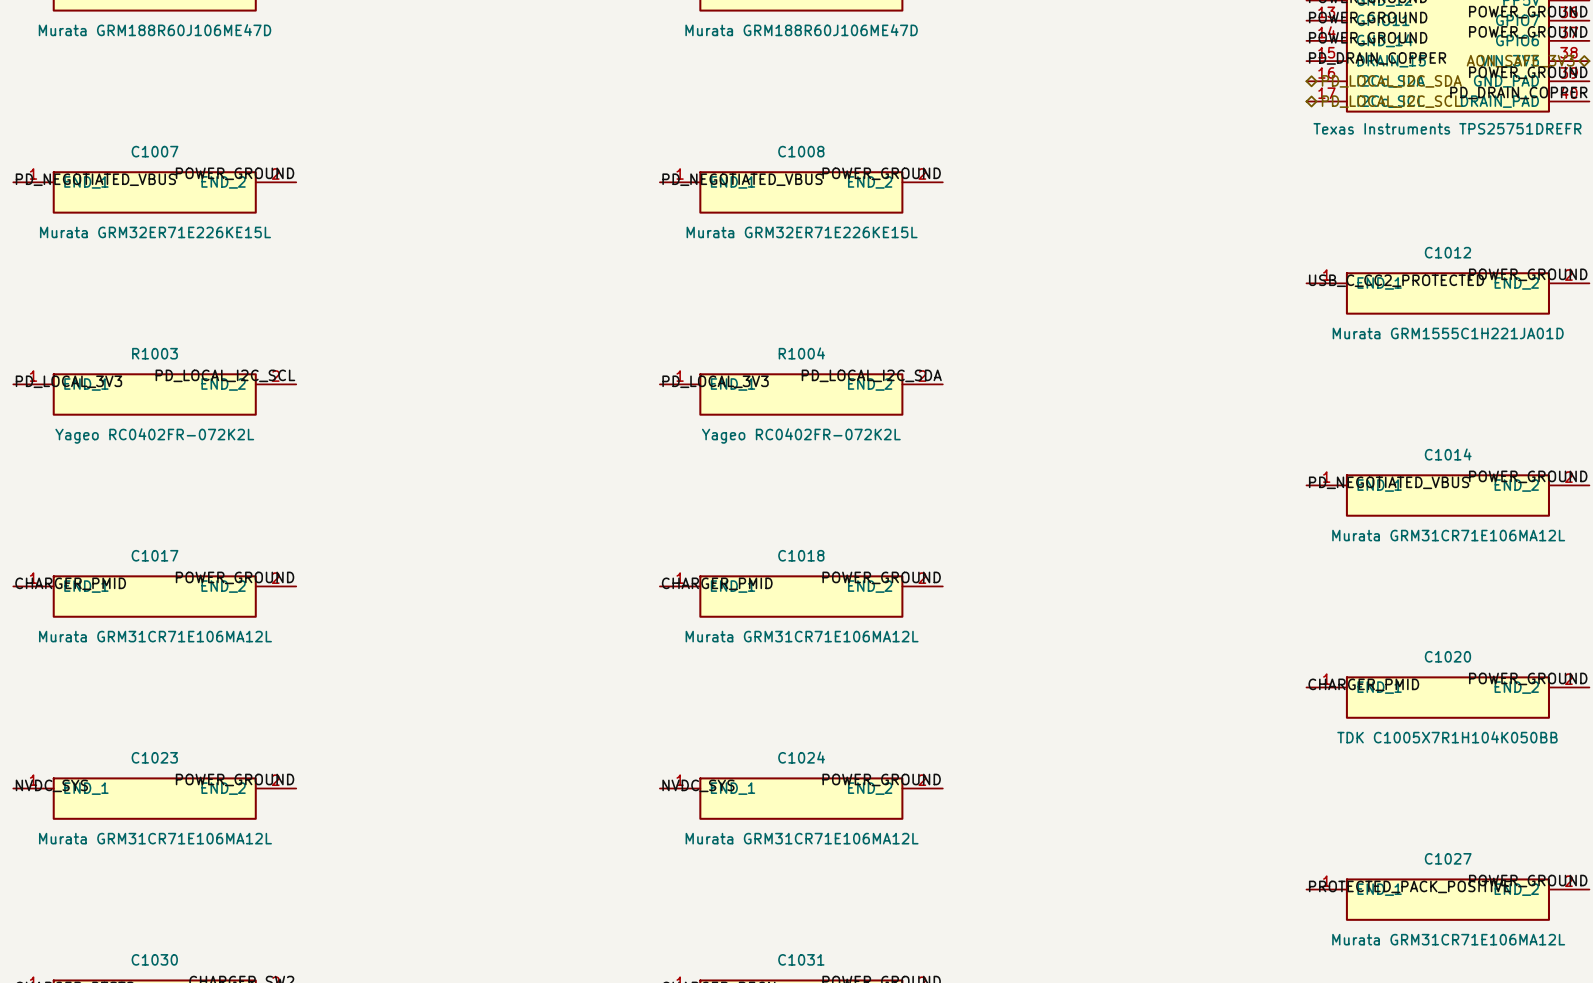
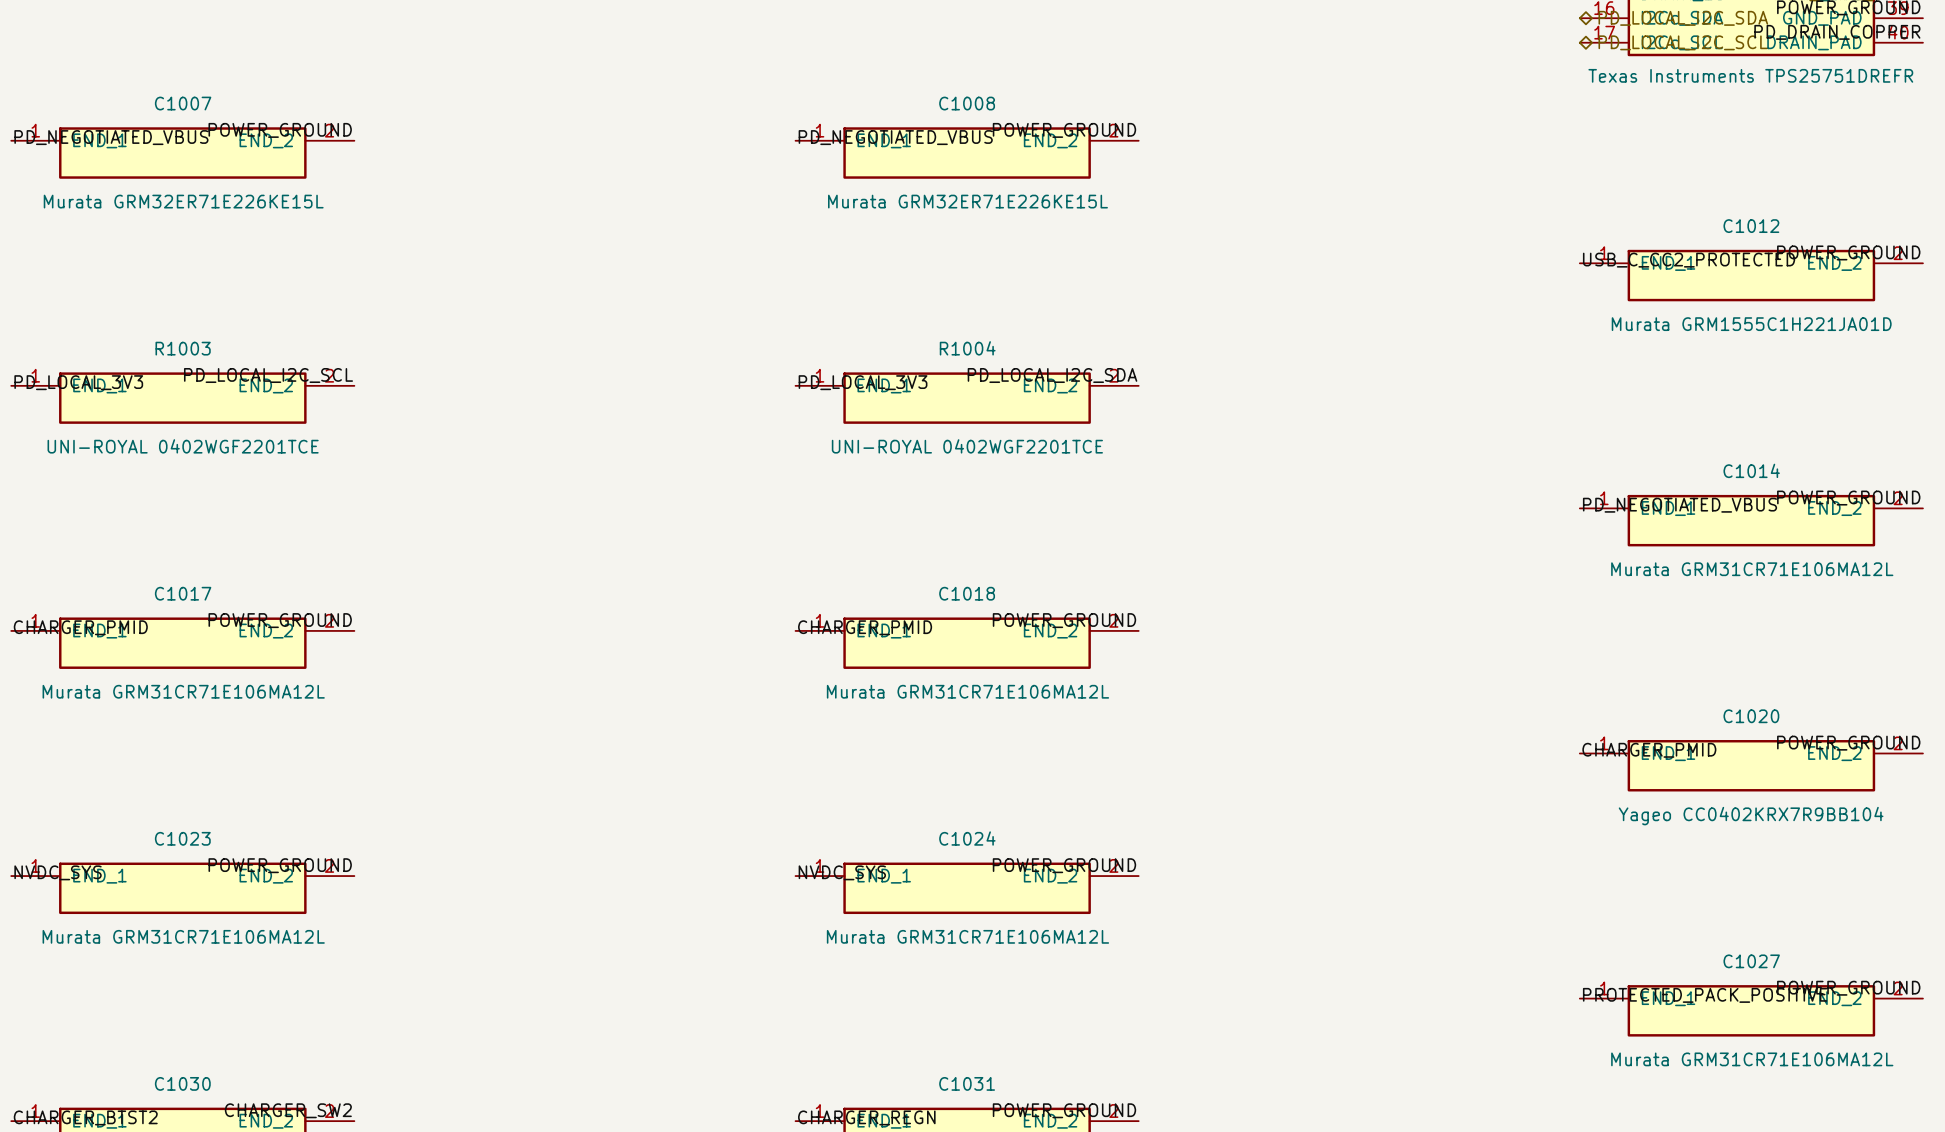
R1003 value: Yageo RC0402FR-072K2L (154, 435) -> UNI-ROYAL 0402WGF2201TCE (183, 446)
R1004 value: Yageo RC0402FR-072K2L (801, 435) -> UNI-ROYAL 0402WGF2201TCE (967, 446)
C1020 value: TDK C1005X7R1H104K050BB (1447, 737) -> Yageo CC0402KRX7R9BB104 (1751, 816)

